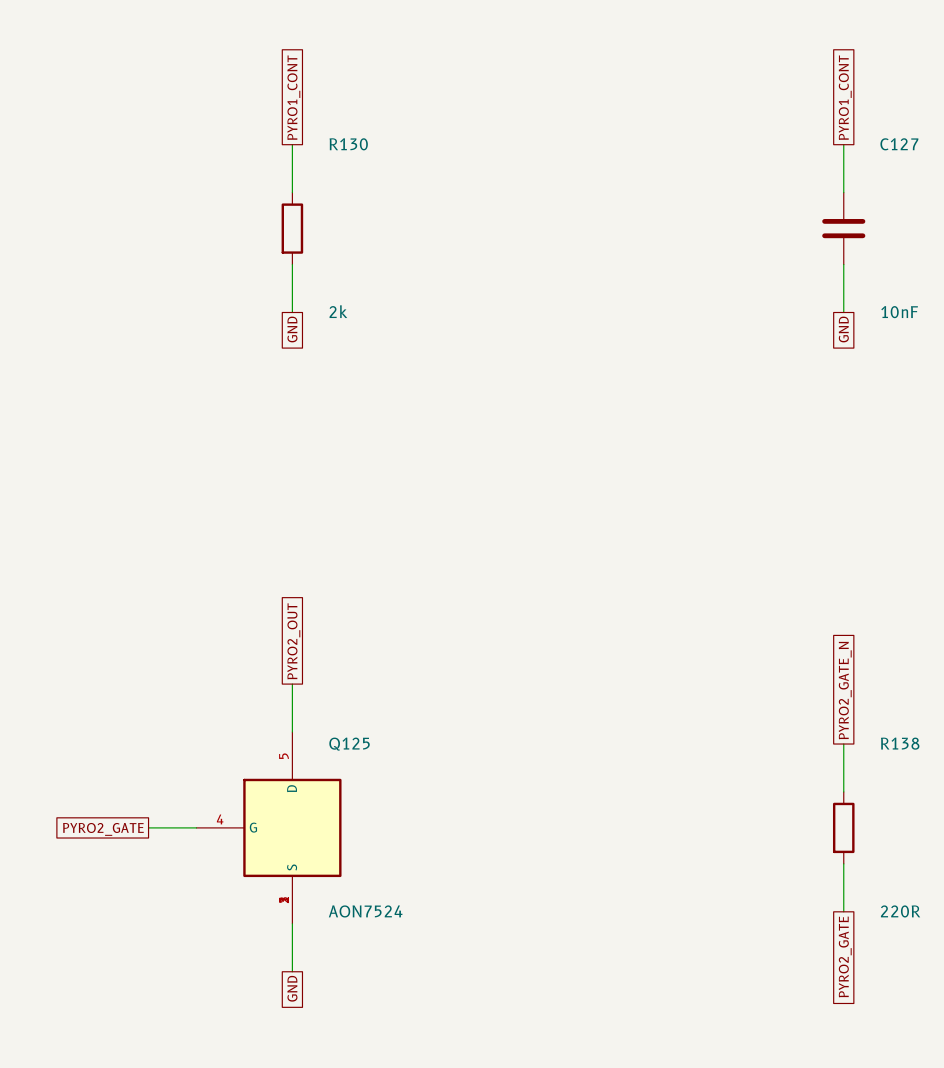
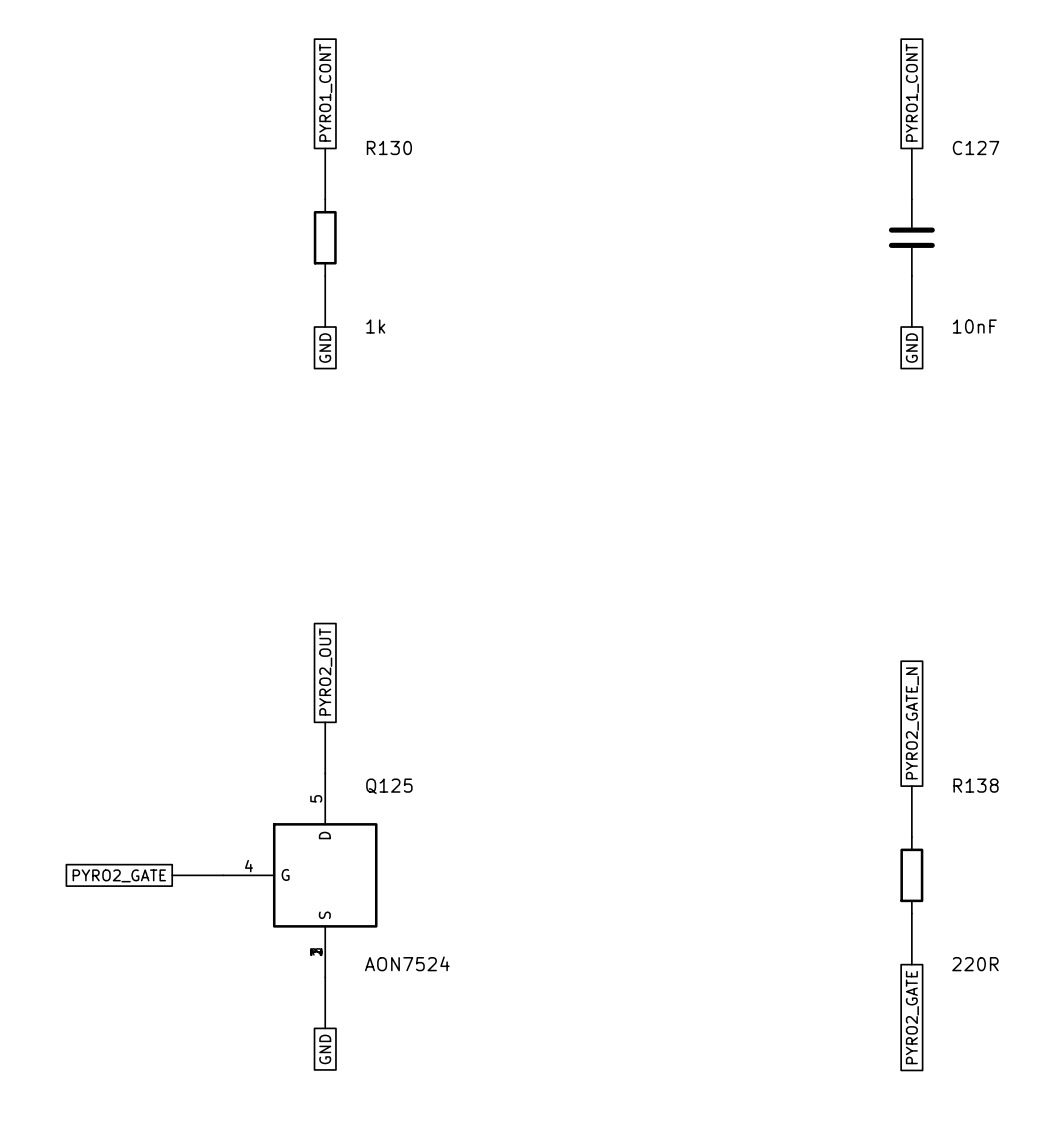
R130 value: 2k (338, 311) -> 1k (375, 326)

